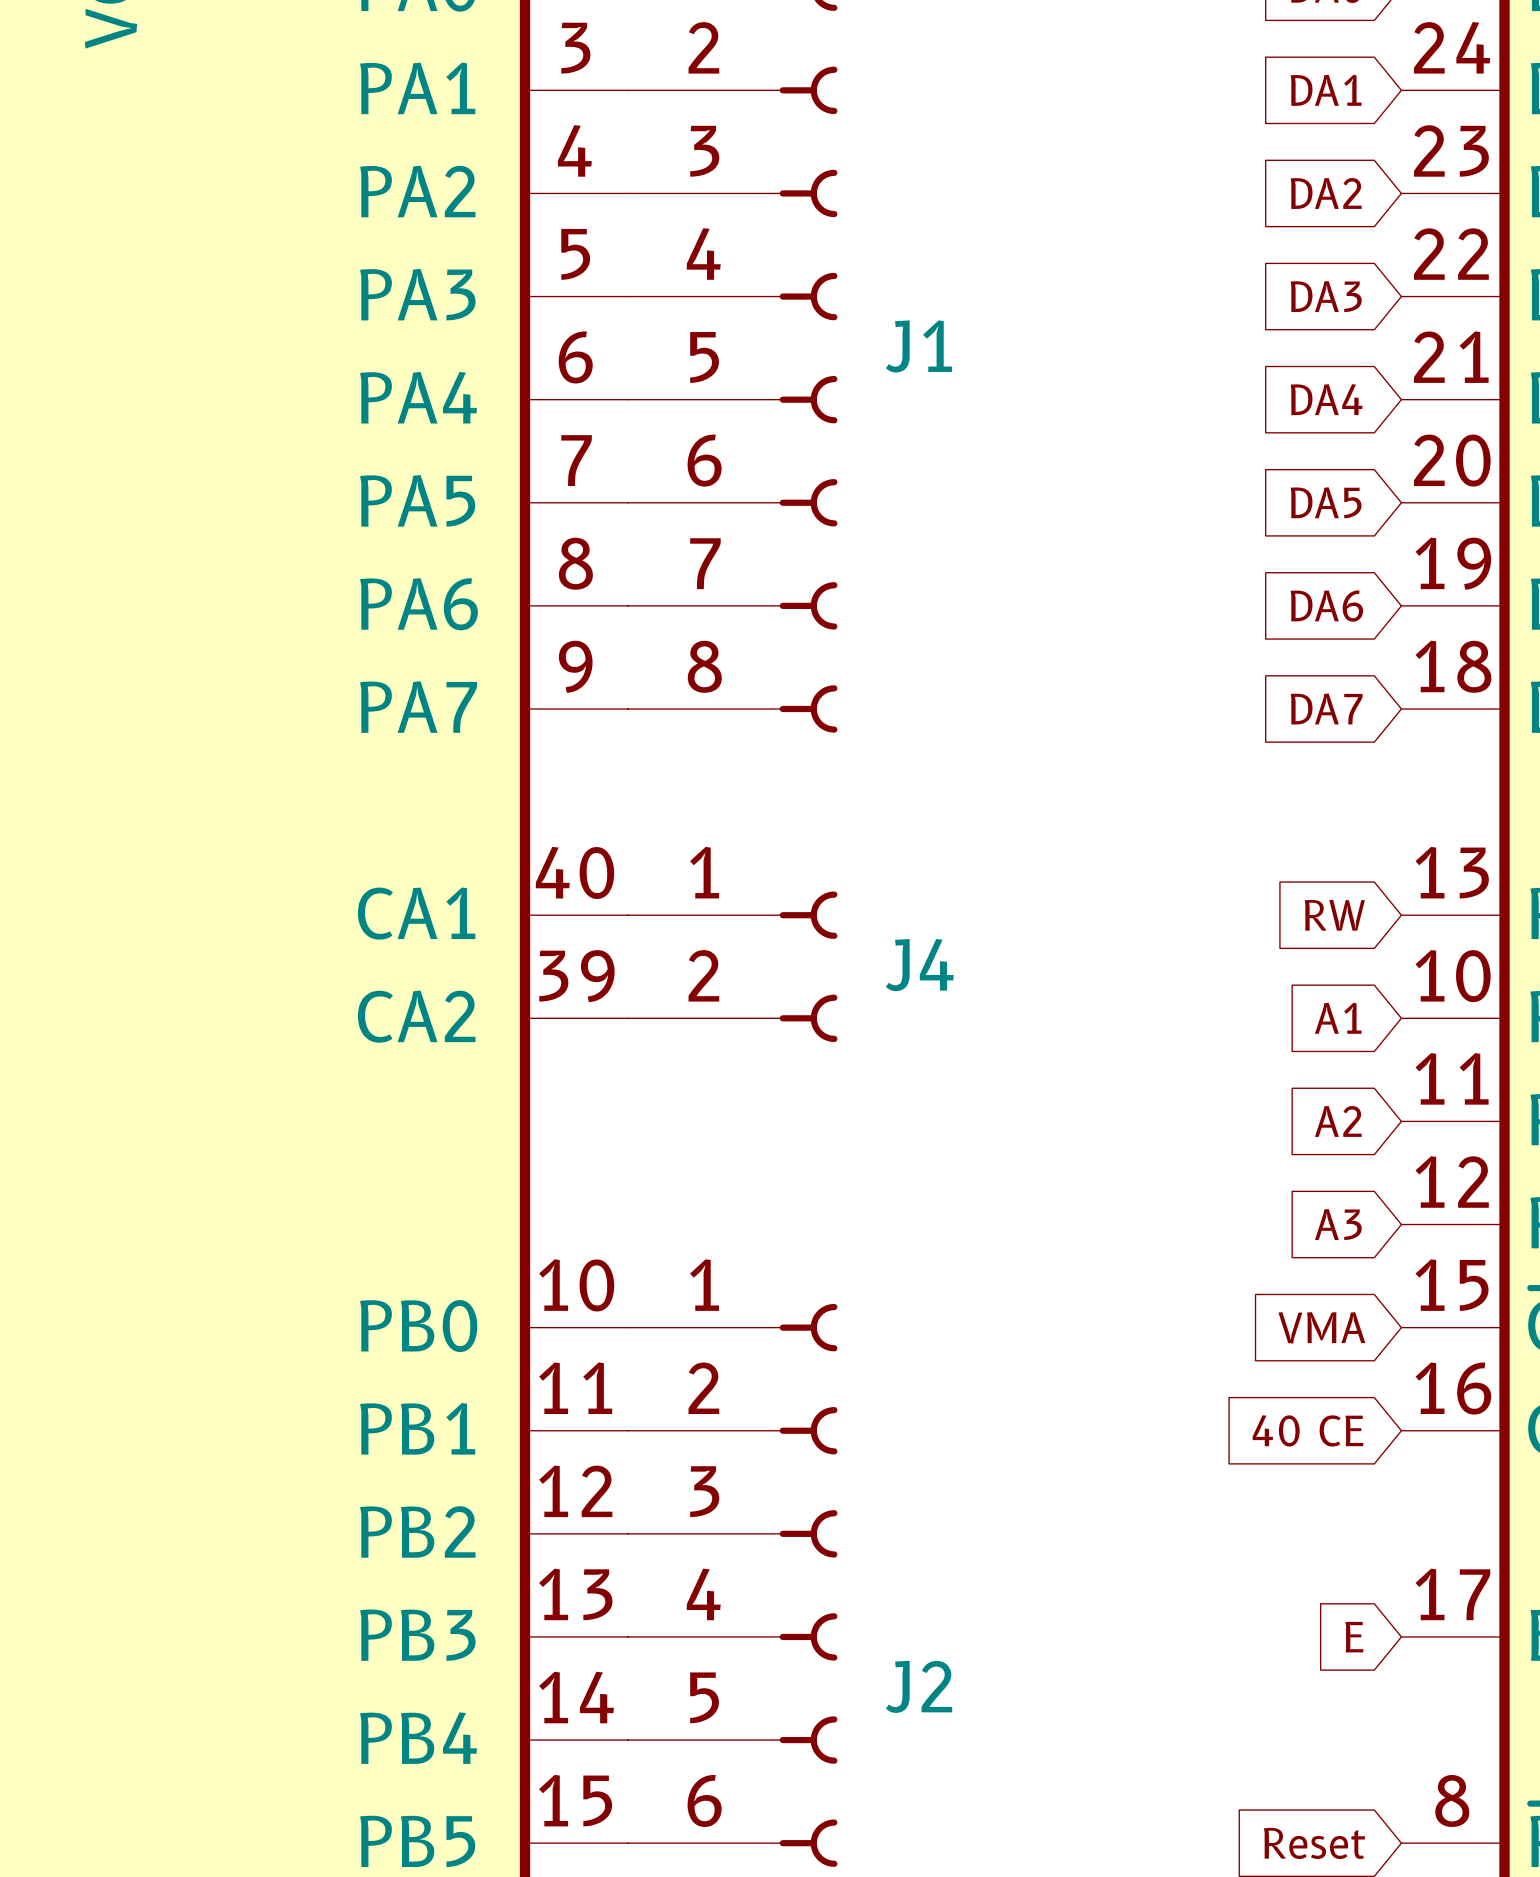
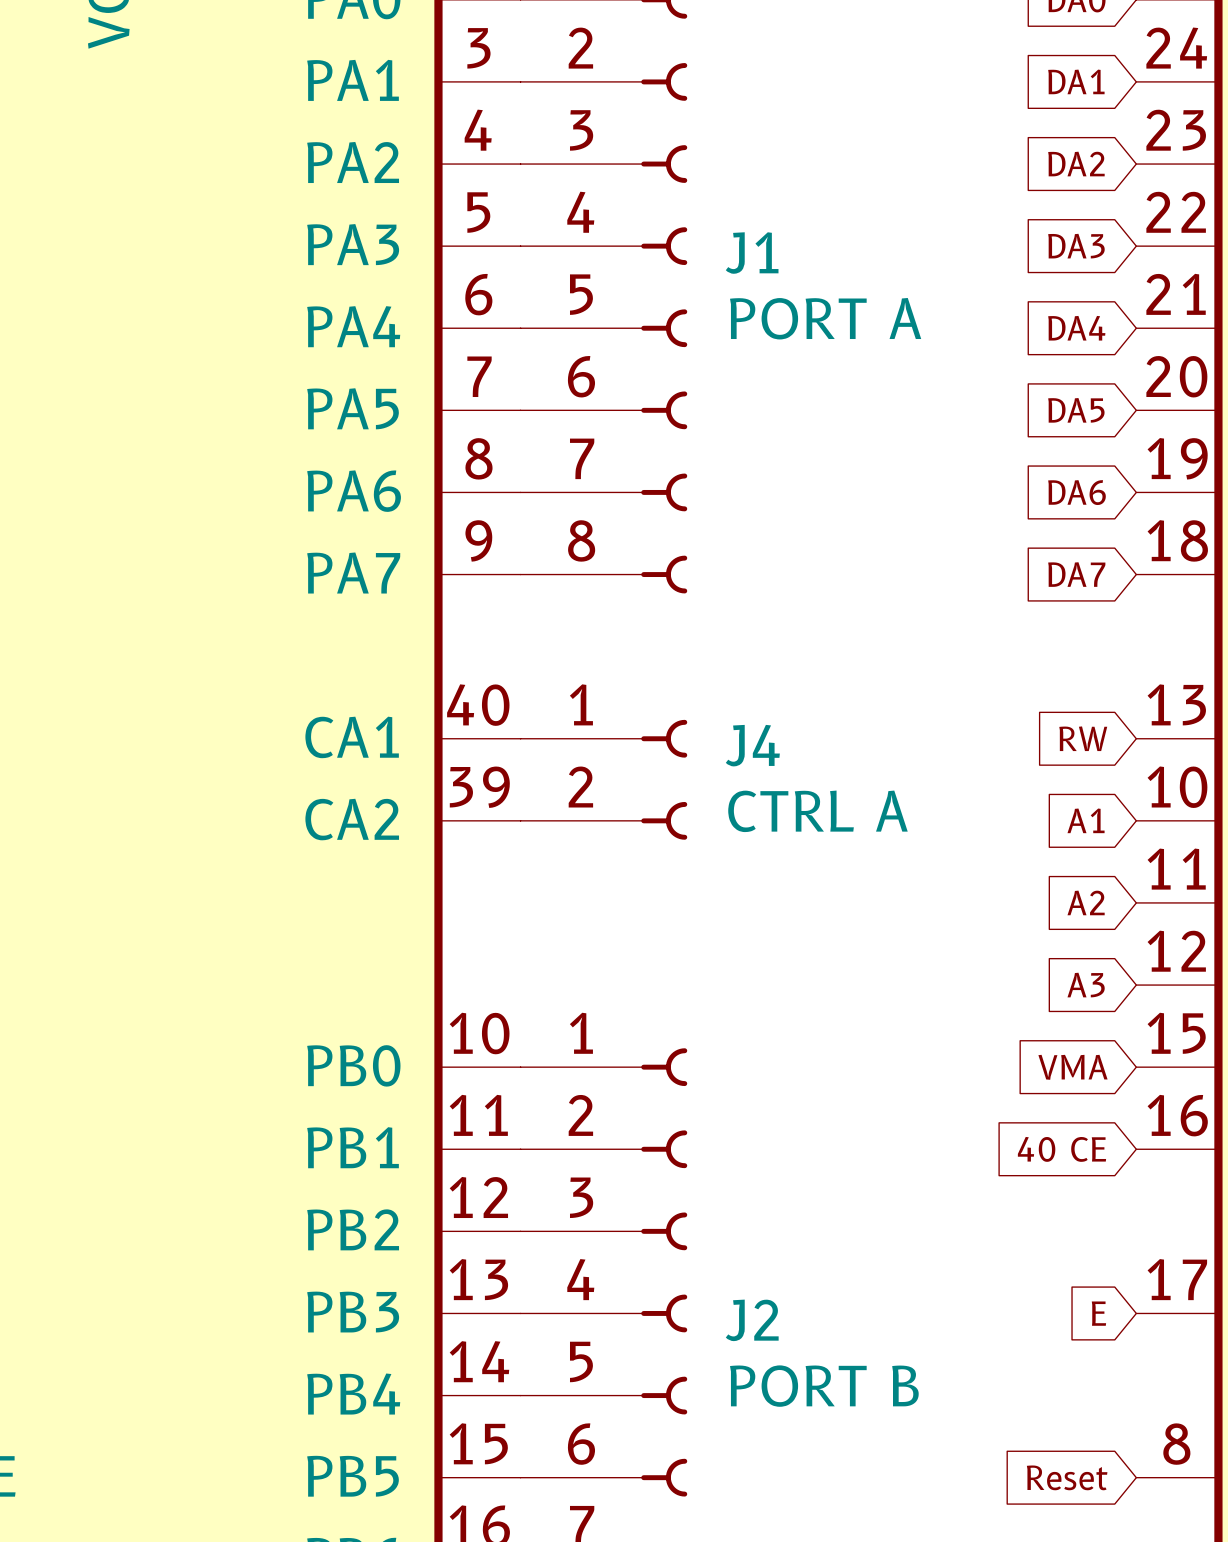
J1 name position: J1 (918, 346) -> J1 (752, 253)
J1 value: none -> PORT A (825, 318)
J4 name position: J4 (919, 965) -> J4 (752, 745)
J4 value: none -> CTRL A (817, 811)
J2 name position: J2 (919, 1686) -> J2 (752, 1320)
J2 value: none -> PORT B (824, 1386)

